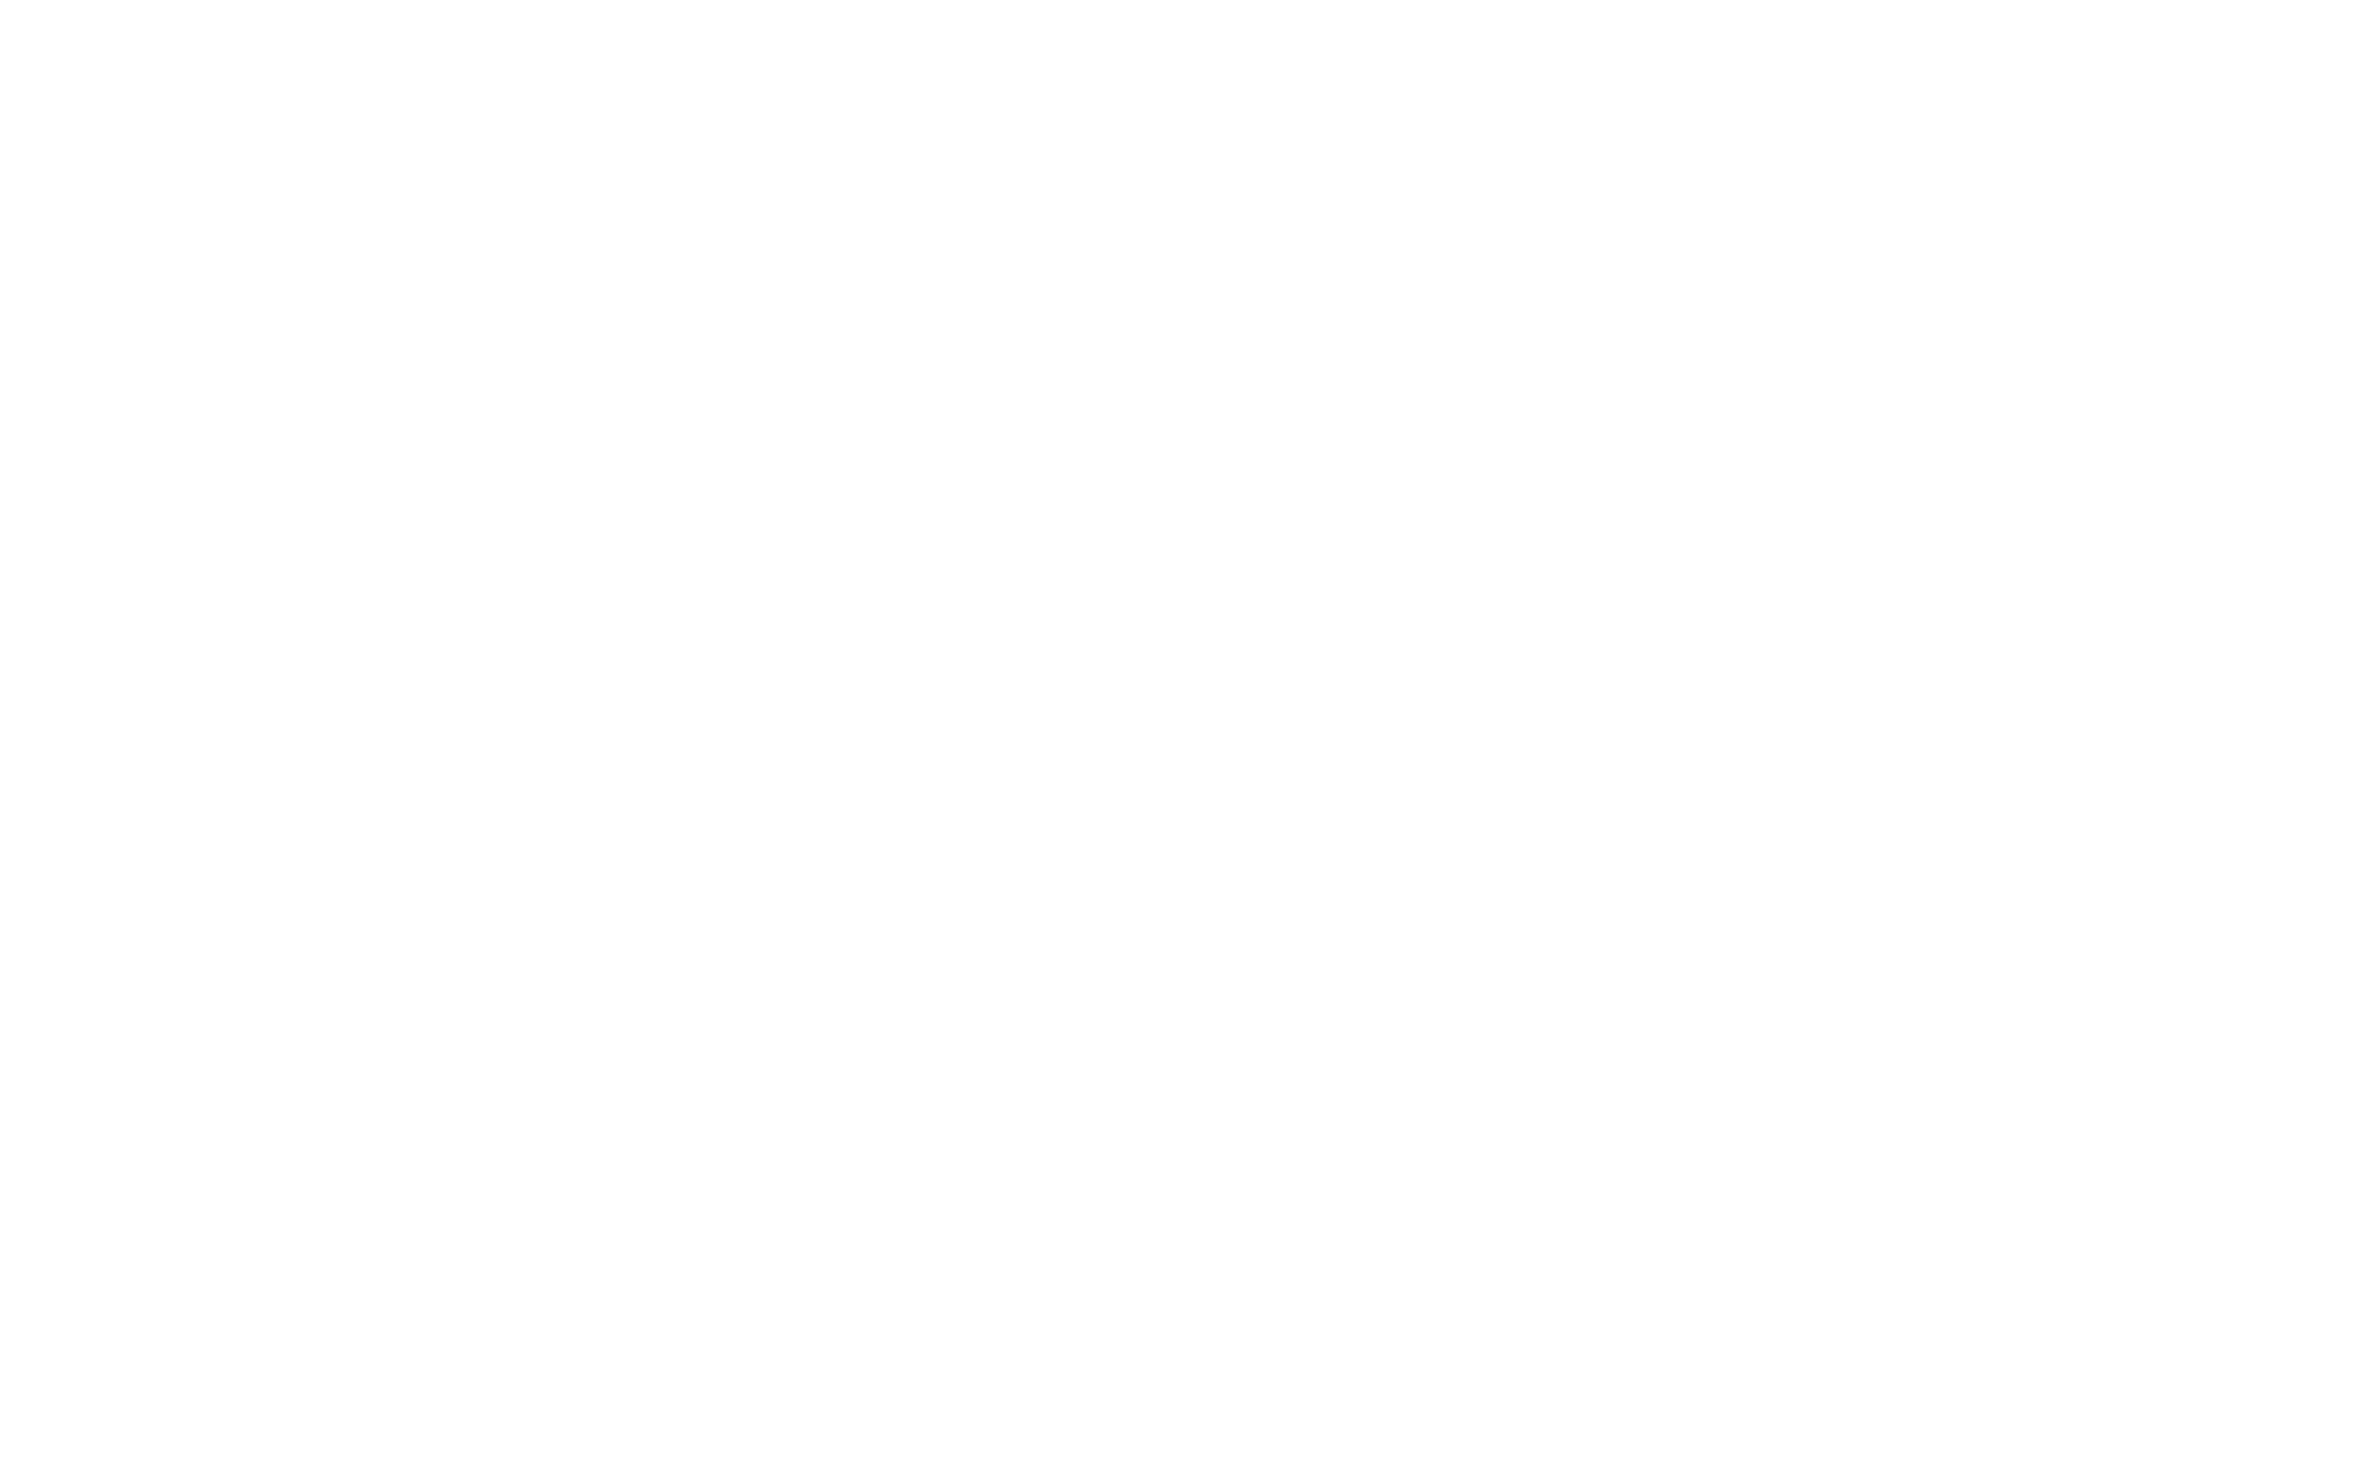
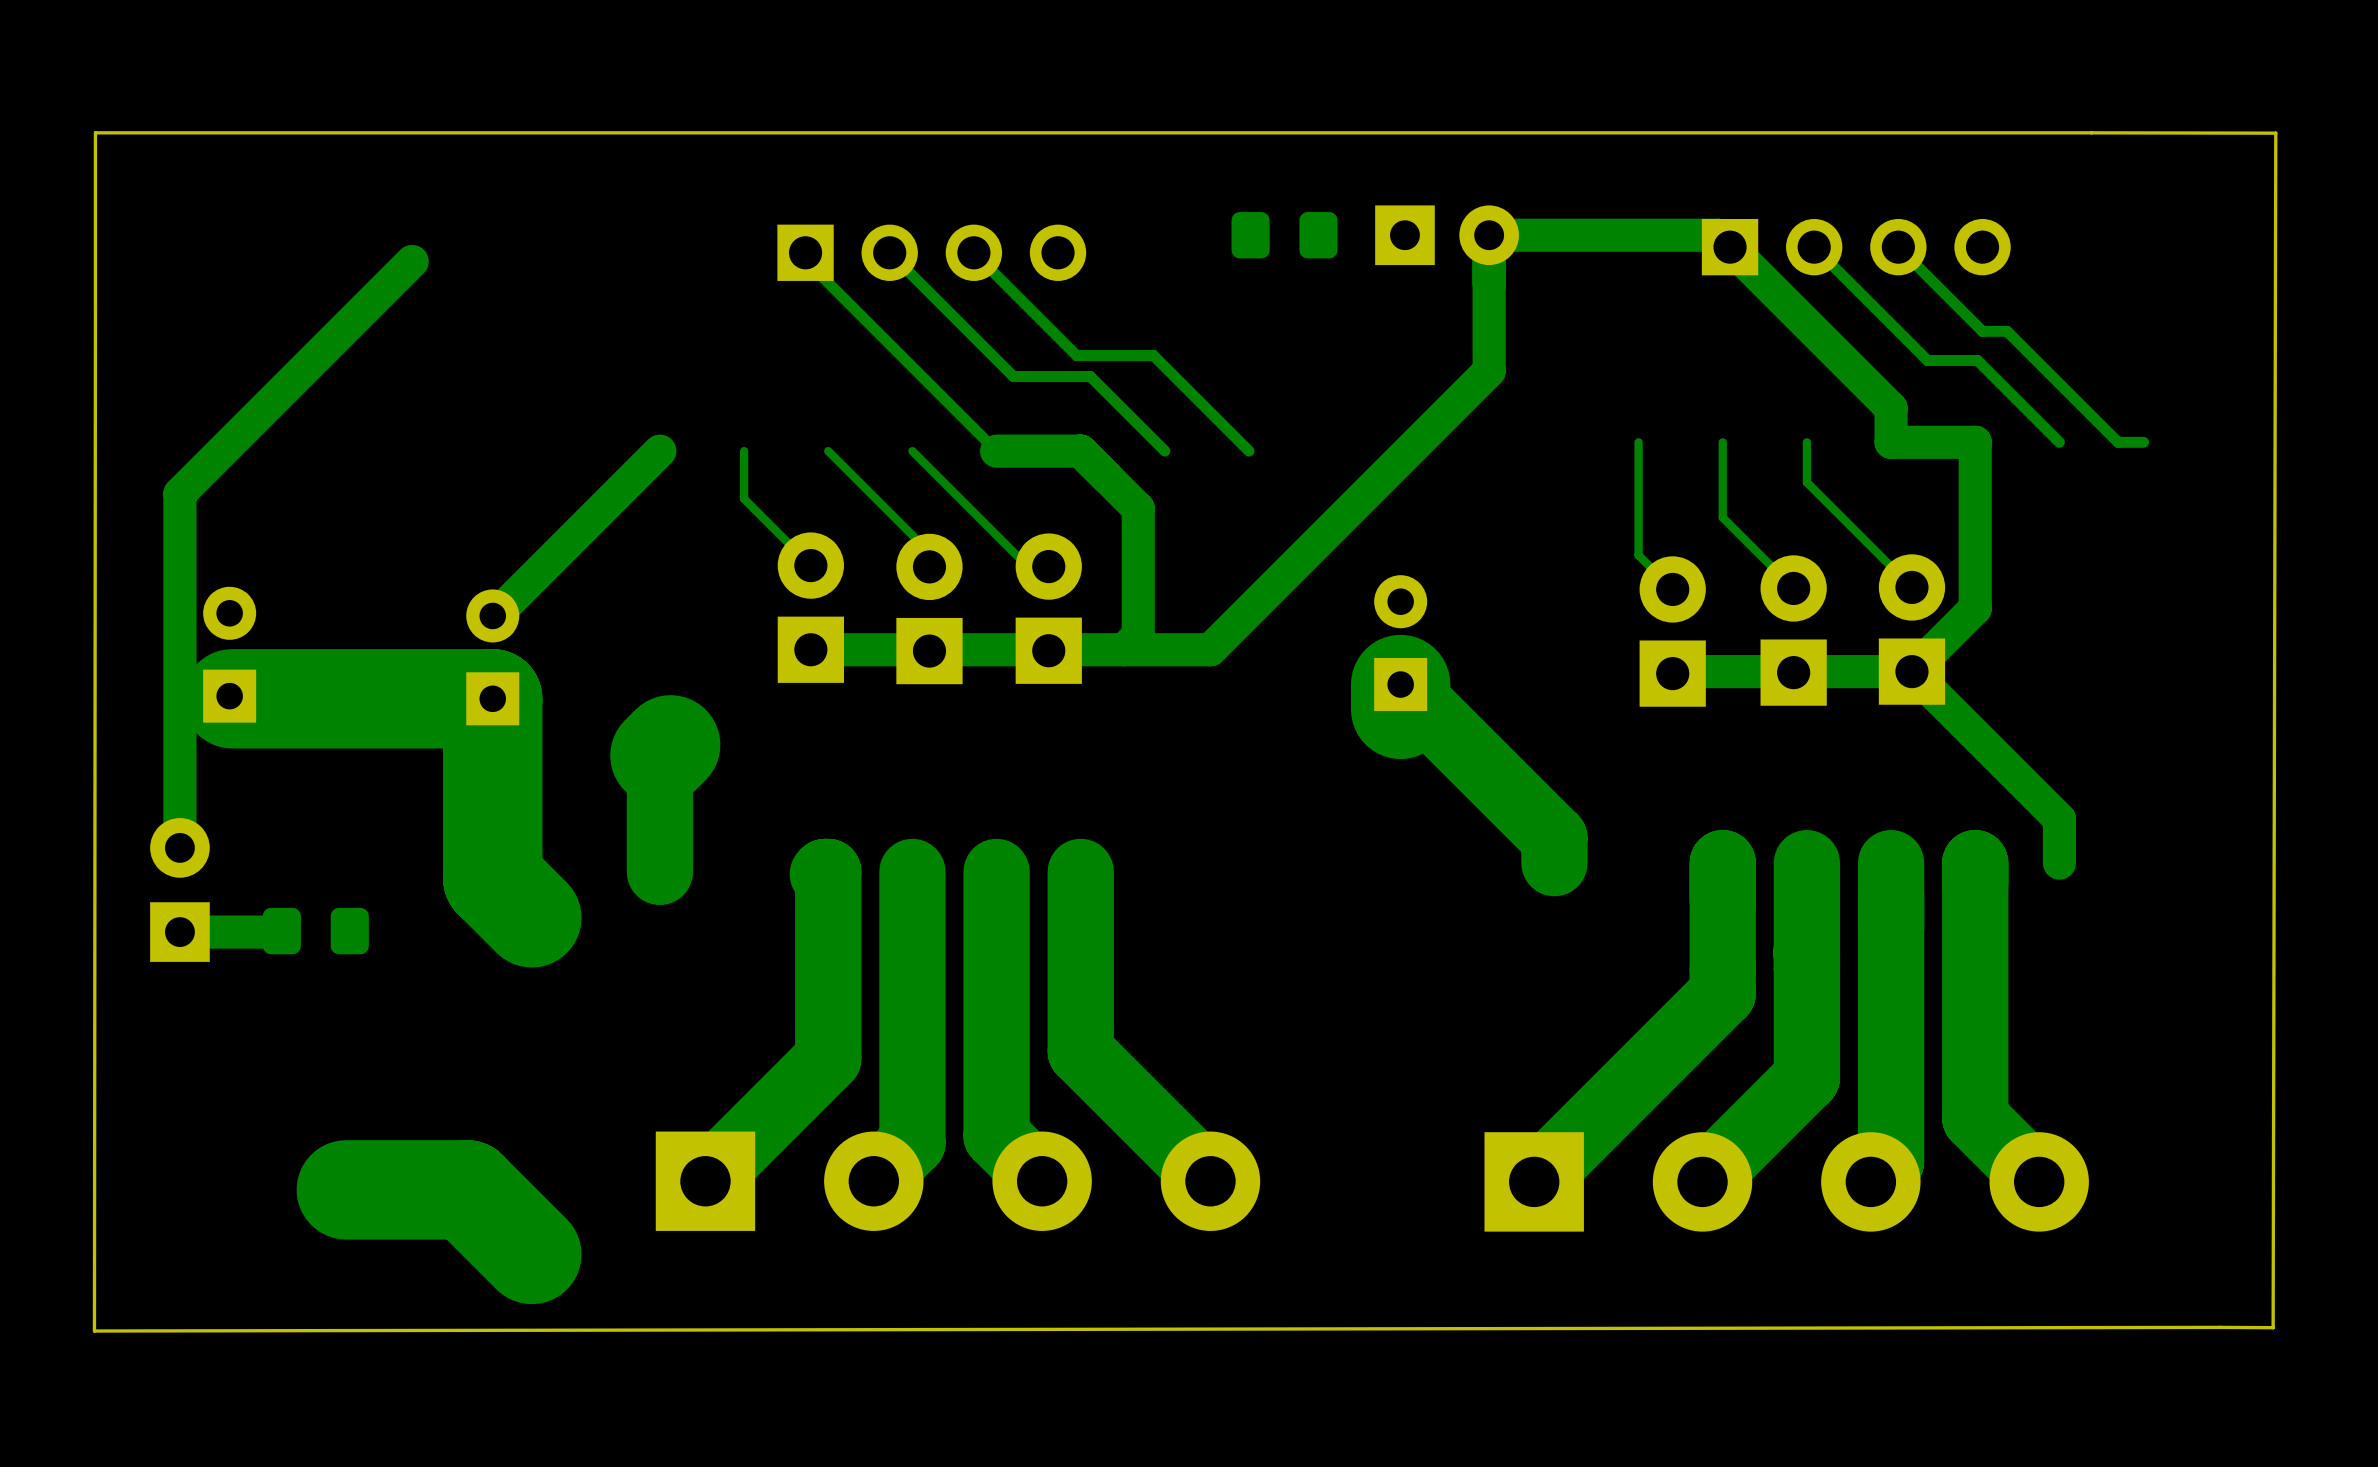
board edge: none -> (95, 132) (94, 1331) (2273, 1327) (2275, 133) (95, 132)
part: none -> (1284, 235)
part: none -> (1447, 235)
bottom track: none -> (1814, 247) (1927, 360) (1977, 360) (2059, 442)
part: none -> (1856, 247)
bottom track: none -> (1898, 247) (1982, 331) (2007, 331) (2118, 442) (2143, 442) (2120, 442)
bottom track: none -> (805, 252) (805, 260) (996, 451) (1080, 451) (1138, 508) (1138, 635) (1123, 649)
bottom track: none -> (889, 252) (1013, 376) (1090, 376) (1164, 451)
part: none -> (931, 252)
bottom track: none -> (973, 252) (1076, 355) (1153, 355) (1249, 451)
bottom track: none -> (412, 261) (179, 493) (179, 847)
bottom track: none -> (1638, 442) (1638, 555) (1672, 589)
bottom track: none -> (1722, 442) (1722, 517) (1793, 588)
bottom track: none -> (1806, 442) (1806, 482) (1911, 587)
bottom track: none -> (659, 451) (495, 615) (492, 615)
bottom track: none -> (744, 451) (744, 498) (810, 565)
bottom track: none -> (828, 451) (929, 552) (929, 566)
bottom track: none -> (912, 451) (1027, 566) (1048, 566)
part: none -> (810, 607)
part: none -> (929, 608)
part: none -> (1048, 608)
part: none -> (1911, 629)
part: none -> (1793, 630)
part: none -> (1672, 631)
part: none -> (1400, 643)
bottom track: none -> (1048, 650) (810, 649) (1210, 649) (1489, 371) (1489, 235) (1718, 235) (1891, 408) (1891, 442) (1975, 442) (1975, 608) (1911, 671)
part: none -> (229, 654)
part: none -> (492, 657)
bottom track: none -> (1911, 671) (1674, 671) (1672, 673)
bottom track: none -> (1911, 671) (2059, 819) (2059, 863)
bottom track: none -> (232, 698) (492, 698) (492, 878) (531, 917)
bottom track: none -> (1400, 709) (1400, 684) (1554, 838) (1554, 863)
bottom track: none -> (670, 744) (659, 755) (659, 871)
bottom track: none -> (1722, 863) (1722, 993) (1534, 1181)
bottom track: none -> (1806, 863) (1806, 1077) (1702, 1181)
bottom track: none -> (1975, 863) (1975, 1117) (2039, 1181)
bottom track: none -> (912, 871) (912, 1142) (873, 1181)
bottom track: none -> (996, 871) (996, 1135) (1042, 1181)
bottom track: none -> (1080, 871) (1080, 1051) (1210, 1181)
bottom track: none -> (822, 874) (828, 871) (828, 1058) (705, 1181)
part: none -> (179, 889)
bottom track: none -> (1891, 929) (1891, 863) (1891, 1161) (1870, 1181)
bottom track: none -> (281, 931) (179, 932)
part: none -> (315, 931)
part: none -> (957, 1181)
part: none -> (1786, 1181)
bottom track: none -> (346, 1189) (467, 1189) (531, 1254)

